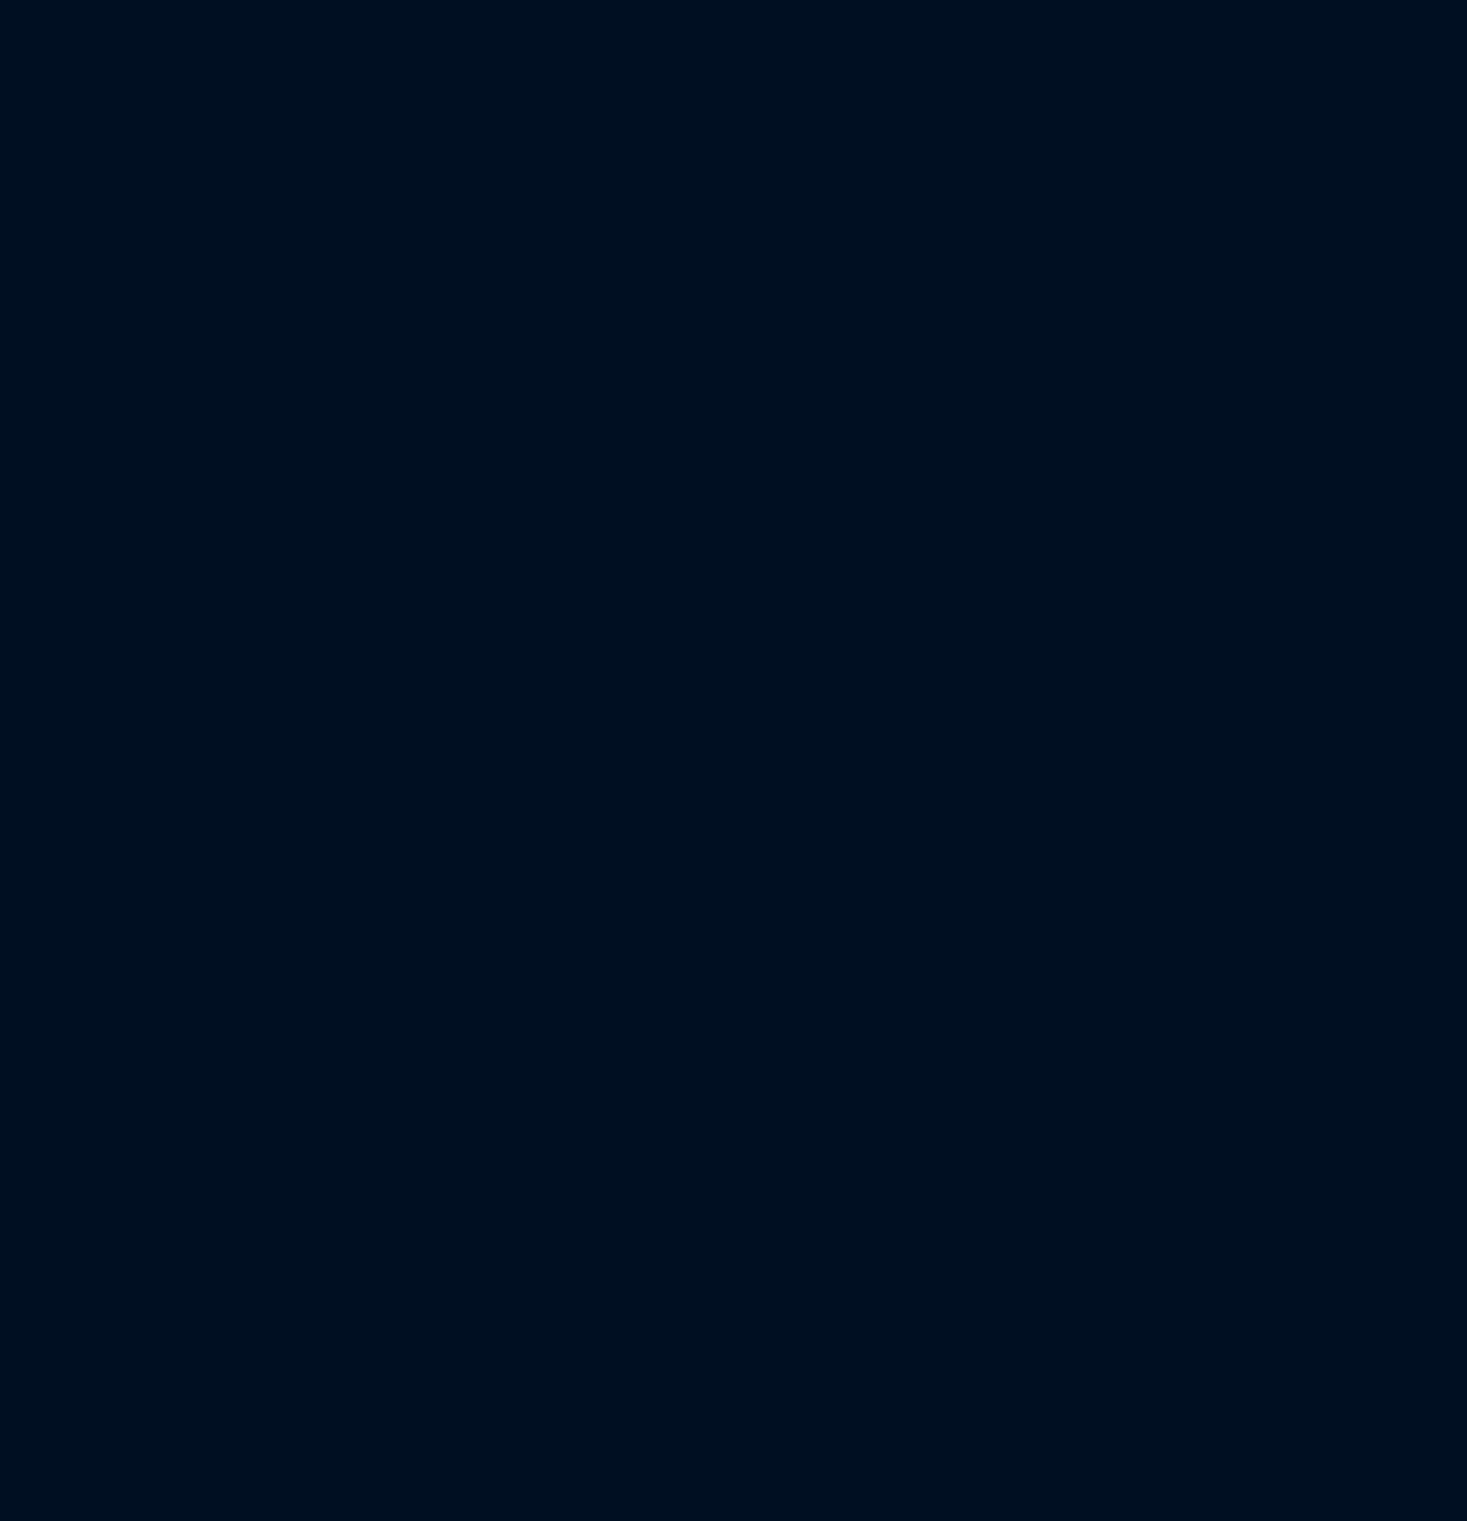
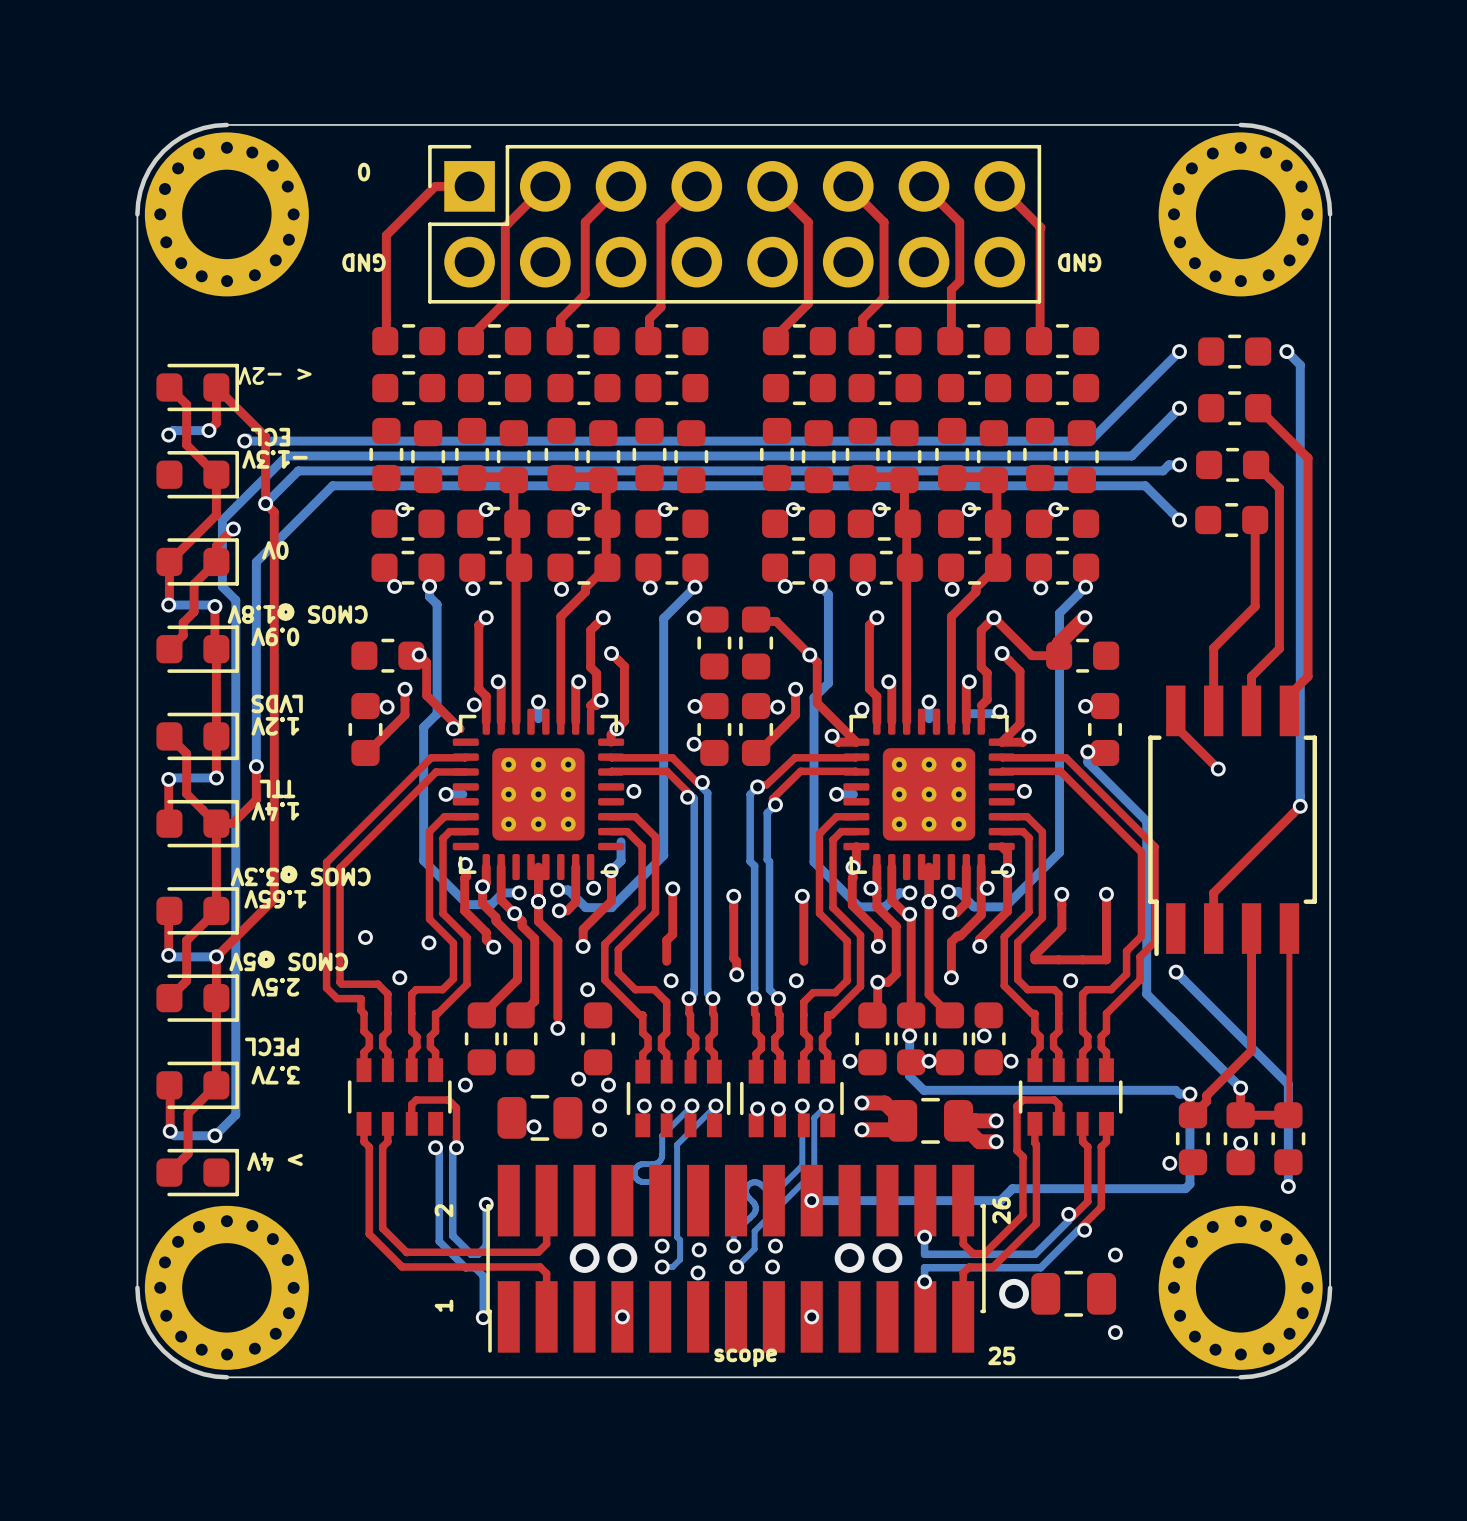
board edge: none -> (226, 124) (1240, 124) (1263, 128) (1285, 136) (1295, 143) (1311, 159) (1318, 169) (1327, 191) (1330, 214) (1330, 1287) (1327, 1310) (1318, 1332) (1311, 1342) (1295, 1358) (1285, 1365) (1263, 1374) (1240, 1377) (226, 1377) (203, 1374) (182, 1365) (172, 1358) (155, 1342) (149, 1332) (140, 1310) (137, 1287) (137, 214) (140, 191) (144, 180) (155, 159) (163, 151) (172, 143) (192, 131) (203, 128) (226, 124)
text: none -> 0 (364, 172)
top track: none -> (469, 186) (435, 186) (386, 235) (386, 341) (390, 341)
top track: none -> (545, 186) (505, 226) (505, 301) (472, 335) (472, 341)
top track: none -> (621, 186) (585, 222) (585, 294) (560, 318) (560, 341)
top track: none -> (696, 186) (661, 222) (661, 307) (649, 318) (649, 341)
top track: none -> (772, 186) (808, 222) (808, 303) (776, 335) (776, 341) (772, 336)
top track: none -> (848, 186) (884, 222) (884, 297) (862, 318) (862, 341)
top track: none -> (923, 186) (959, 222) (959, 281) (951, 289) (951, 341)
top track: none -> (999, 186) (1040, 227) (1040, 341)
part: none -> (226, 214)
part: none -> (1240, 214)
part: none -> (734, 224)
text: none -> GND (364, 262)
text: none -> GND (1079, 262)
part: none -> (408, 341)
part: none -> (494, 341)
part: none -> (583, 341)
part: none -> (671, 341)
part: none -> (799, 341)
part: none -> (885, 341)
part: none -> (973, 341)
part: none -> (1062, 341)
bottom track: none -> (1179, 351) (1090, 441) (244, 441) (247, 438)
via: none -> (1179, 351)
part: none -> (1234, 351)
bottom track: none -> (1286, 351) (1300, 364) (1300, 806)
via: none -> (1286, 351)
text: none -> < -2V (274, 375)
top track: none -> (169, 387) (186, 404) (186, 444) (216, 474) (216, 514) (169, 561) (168, 605)
part: none -> (197, 387)
part: none -> (408, 388)
part: none -> (494, 388)
part: none -> (583, 388)
part: none -> (671, 388)
part: none -> (799, 388)
part: none -> (885, 388)
part: none -> (974, 388)
part: none -> (1062, 388)
bottom track: none -> (1179, 408) (1131, 455) (286, 455) (222, 520) (222, 586) (235, 600) (235, 1114) (214, 1135) (174, 1135) (170, 1131)
via: none -> (1179, 408)
part: none -> (1234, 408)
top track: none -> (1258, 408) (1308, 458) (1308, 676) (1289, 695) (1289, 710)
top track: none -> (208, 430) (216, 423) (216, 387) (265, 436) (265, 503) (274, 512) (274, 899) (216, 956) (216, 1085) (188, 1113) (188, 1153) (169, 1172)
bottom track: none -> (208, 430) (173, 430) (168, 435)
via: none -> (208, 430)
via: none -> (168, 435)
text: none -> ECL (270, 437)
via: none -> (244, 441)
part: none -> (386, 454)
part: none -> (472, 454)
part: none -> (561, 454)
part: none -> (649, 454)
part: none -> (776, 454)
part: none -> (862, 454)
part: none -> (952, 454)
part: none -> (1040, 454)
part: none -> (428, 456)
part: none -> (513, 456)
part: none -> (603, 456)
part: none -> (691, 456)
part: none -> (818, 456)
part: none -> (904, 456)
part: none -> (993, 456)
part: none -> (1081, 456)
text: none -> -1.3V (274, 459)
bottom track: none -> (1179, 464) (1168, 464) (1162, 470) (298, 470) (265, 503)
via: none -> (1179, 464)
part: none -> (1232, 464)
top track: none -> (1256, 464) (1279, 488) (1279, 648) (1251, 676) (1251, 710)
part: none -> (197, 474)
top track: none -> (472, 476) (511, 476) (513, 479) (513, 521) (516, 523) (516, 565) (518, 567) (516, 569) (516, 721)
top track: none -> (561, 476) (601, 476) (606, 482) (606, 567) (585, 587) (585, 591) (560, 616) (560, 721)
top track: none -> (862, 476) (902, 476) (904, 479) (904, 521) (906, 523) (906, 565) (908, 567) (906, 569) (906, 721)
top track: none -> (952, 476) (991, 476) (996, 482) (996, 567) (976, 587) (976, 591) (951, 616) (951, 721)
via: none -> (265, 503)
via: none -> (402, 509)
via: none -> (486, 509)
via: none -> (578, 509)
via: none -> (665, 509)
via: none -> (793, 509)
via: none -> (879, 509)
via: none -> (969, 509)
via: none -> (1055, 509)
bottom track: none -> (1179, 520) (1145, 485) (332, 485) (256, 562) (256, 766)
via: none -> (1179, 520)
part: none -> (1231, 520)
top track: none -> (1255, 520) (1255, 606) (1213, 648) (1213, 710)
part: none -> (408, 523)
part: none -> (493, 523)
part: none -> (583, 523)
part: none -> (671, 523)
part: none -> (798, 523)
part: none -> (884, 523)
part: none -> (974, 523)
part: none -> (1062, 523)
top track: none -> (233, 528) (216, 546) (216, 561) (194, 584) (194, 611) (183, 622) (183, 635) (169, 649)
via: none -> (233, 528)
text: none -> 0V (275, 550)
part: none -> (197, 561)
part: none -> (408, 567)
part: none -> (495, 567)
part: none -> (583, 567)
part: none -> (671, 567)
part: none -> (798, 567)
part: none -> (886, 567)
part: none -> (974, 567)
part: none -> (1062, 567)
via: none -> (394, 586)
bottom track: none -> (429, 586) (429, 596) (437, 604) (437, 713) (423, 727) (423, 860) (467, 904) (491, 904) (502, 892) (519, 892)
via: none -> (429, 586)
via: none -> (785, 586)
bottom track: none -> (820, 586) (828, 594) (828, 683) (814, 697) (814, 861) (858, 906) (885, 906) (899, 892) (909, 892)
via: none -> (820, 586)
via: none -> (650, 587)
bottom track: none -> (694, 587) (663, 618) (663, 855)
via: none -> (694, 587)
via: none -> (1040, 587)
bottom track: none -> (1085, 587) (1059, 613) (1059, 852) (1005, 906) (974, 906) (958, 891) (948, 891)
via: none -> (1085, 587)
via: none -> (472, 588)
via: none -> (863, 588)
via: none -> (561, 589)
via: none -> (952, 589)
bottom track: none -> (168, 605) (214, 606)
via: none -> (168, 605)
top track: none -> (214, 606) (216, 777)
via: none -> (214, 606)
text: none -> CMOS @1.8V (297, 613)
top track: none -> (486, 617) (478, 625) (478, 688) (486, 696) (486, 721)
via: none -> (486, 617)
top track: none -> (603, 617) (590, 630) (590, 667) (596, 673) (596, 699) (590, 705) (595, 705) (601, 700)
via: none -> (603, 617)
via: none -> (694, 617)
top track: none -> (876, 617) (869, 625) (869, 688) (876, 696) (876, 721)
via: none -> (876, 617)
via: none -> (993, 617)
top track: none -> (1084, 617) (1059, 643) (1059, 655) (1031, 655) (993, 617) (981, 630) (981, 667) (987, 673) (987, 699) (981, 705)
via: none -> (1084, 617)
top track: none -> (756, 621) (776, 621) (817, 662) (817, 703) (856, 742) (838, 742) (832, 736)
text: none -> 0.9V (275, 636)
part: none -> (714, 643)
part: none -> (756, 643)
part: none -> (197, 649)
top track: none -> (611, 653) (624, 666) (624, 721) (611, 734) (611, 742)
via: none -> (611, 653)
top track: none -> (1002, 653) (1020, 671) (1020, 723) (1001, 742) (1022, 742) (1028, 736)
via: none -> (1002, 653)
top track: none -> (419, 654) (426, 662) (426, 695) (459, 728) (453, 728)
via: none -> (419, 654)
via: none -> (809, 654)
part: none -> (387, 655)
part: none -> (1082, 655)
top track: none -> (498, 681) (501, 684) (501, 721)
via: none -> (498, 681)
top track: none -> (578, 681) (575, 684) (575, 721)
via: none -> (578, 681)
top track: none -> (888, 681) (891, 684) (891, 721)
via: none -> (888, 681)
top track: none -> (969, 681) (966, 684) (966, 721)
via: none -> (969, 681)
top track: none -> (405, 689) (405, 714) (365, 752)
via: none -> (405, 689)
top track: none -> (795, 689) (795, 714) (756, 752)
via: none -> (795, 689)
via: none -> (601, 700)
bottom track: none -> (538, 701) (538, 718)
via: none -> (538, 701)
bottom track: none -> (929, 701) (929, 718)
via: none -> (929, 701)
text: none -> LVDS (277, 703)
via: none -> (474, 704)
via: none -> (694, 706)
via: none -> (1085, 706)
via: none -> (387, 707)
via: none -> (777, 707)
via: none -> (861, 709)
top track: none -> (1175, 710) (1175, 726) (1218, 769)
bottom track: none -> (999, 711) (997, 713) (971, 713)
via: none -> (999, 711)
text: none -> 1.2V (275, 726)
via: none -> (453, 728)
via: none -> (616, 728)
part: none -> (365, 729)
part: none -> (714, 729)
part: none -> (756, 729)
part: none -> (1104, 729)
top track: none -> (169, 736) (186, 753) (186, 793) (216, 823)
part: none -> (197, 736)
via: none -> (832, 736)
via: none -> (1028, 736)
via: none -> (694, 744)
bottom track: none -> (1087, 751) (1087, 762) (1146, 821) (1146, 994) (1240, 1088)
via: none -> (1087, 751)
top track: none -> (465, 757) (431, 757) (326, 862) (326, 988) (337, 998) (361, 998) (361, 1010) (364, 1013) (364, 1031) (369, 1036) (369, 1047) (364, 1052) (364, 1070)
top track: none -> (611, 757) (672, 757) (697, 782) (702, 782)
top track: none -> (856, 757) (795, 757) (766, 784) (759, 784) (757, 786)
top track: none -> (1001, 757) (1066, 757) (1154, 846) (1154, 941) (1140, 956) (1140, 979) (1106, 1013) (1106, 1031) (1101, 1036) (1101, 1047) (1106, 1052) (1106, 1070)
top track: none -> (256, 766) (256, 799) (232, 823) (216, 823)
via: none -> (256, 766)
via: none -> (1218, 769)
top track: none -> (465, 772) (436, 772) (340, 868) (340, 982) (341, 984) (377, 984) (387, 994) (387, 1031) (382, 1036) (382, 1047) (387, 1052) (387, 1070)
top track: none -> (611, 772) (666, 771) (687, 792) (687, 797)
top track: none -> (856, 772) (800, 771) (772, 798) (775, 804)
top track: none -> (1001, 772) (1060, 771) (1141, 852) (1141, 936) (1126, 951) (1126, 974) (1111, 989) (1087, 989) (1082, 994) (1082, 1031) (1087, 1036) (1087, 1047) (1082, 1052) (1082, 1070)
bottom track: none -> (216, 777) (168, 779)
via: none -> (216, 777)
top track: none -> (168, 779) (169, 823)
via: none -> (168, 779)
bottom track: none -> (702, 782) (702, 787) (707, 793) (707, 993) (712, 998)
via: none -> (702, 782)
bottom track: none -> (757, 786) (750, 794) (750, 861) (754, 865) (754, 998)
via: none -> (757, 786)
text: none -> TTL (277, 788)
via: none -> (633, 791)
via: none -> (1024, 791)
bottom track: none -> (446, 794) (462, 794)
via: none -> (446, 794)
part: none -> (538, 794)
bottom track: none -> (836, 794) (853, 794)
via: none -> (836, 794)
part: none -> (929, 794)
bottom track: none -> (687, 797) (694, 798) (694, 993) (689, 998)
via: none -> (687, 797)
bottom track: none -> (775, 804) (767, 813) (767, 859) (769, 861) (769, 989) (778, 998)
via: none -> (775, 804)
top track: none -> (1300, 806) (1213, 892) (1213, 928)
via: none -> (1300, 806)
text: none -> 1.4V (275, 811)
top track: none -> (465, 816) (444, 816) (429, 831) (429, 919) (453, 943) (453, 978) (442, 989) (416, 989) (411, 994) (411, 1031) (416, 1036) (416, 1047) (411, 1052) (411, 1070)
top track: none -> (611, 816) (635, 816) (655, 836) (655, 912) (618, 949) (618, 972) (635, 989) (654, 989) (666, 1001) (666, 1032) (661, 1038) (661, 1048) (666, 1053) (666, 1071)
top track: none -> (856, 816) (836, 816) (819, 833) (819, 913) (847, 940) (847, 980) (835, 992) (813, 992) (803, 1001) (803, 1032) (809, 1038) (809, 1048) (803, 1053) (803, 1071)
top track: none -> (1001, 816) (1027, 816) (1042, 832) (1042, 917) (1017, 942) (1017, 979) (1027, 989) (1054, 989) (1058, 994) (1058, 1031) (1053, 1036) (1053, 1047) (1058, 1052) (1058, 1070)
part: none -> (1232, 820)
part: none -> (197, 823)
top track: none -> (216, 823) (216, 910) (186, 940) (186, 980) (169, 998)
top track: none -> (465, 831) (449, 831) (443, 838) (443, 913) (466, 937) (466, 984) (437, 1013) (435, 1013) (435, 1031) (430, 1036) (430, 1047) (435, 1052) (435, 1070)
top track: none -> (611, 831) (627, 831) (642, 846) (642, 906) (604, 944) (604, 980) (639, 1015) (642, 1015) (642, 1032) (648, 1038) (648, 1048) (642, 1053) (642, 1071)
top track: none -> (856, 831) (841, 831) (832, 839) (832, 907) (860, 935) (860, 986) (831, 1015) (827, 1015) (827, 1032) (822, 1038) (822, 1048) (827, 1053) (827, 1071)
top track: none -> (1001, 831) (1022, 831) (1028, 837) (1028, 912) (1004, 936) (1004, 985) (1031, 1013) (1034, 1013) (1034, 1031) (1040, 1036) (1040, 1047) (1034, 1052) (1034, 1070)
bottom track: none -> (621, 841) (621, 860) (611, 870)
top track: none -> (856, 846) (856, 864) (853, 867) (852, 905) (878, 931) (878, 946)
top track: none -> (1001, 846) (1007, 852) (1007, 911) (979, 938) (979, 946)
bottom track: none -> (663, 855) (611, 907) (585, 907) (568, 889) (557, 889)
top track: none -> (465, 864) (464, 910) (486, 932) (486, 939) (493, 947)
via: none -> (465, 864)
top track: none -> (486, 867) (486, 883) (482, 886) (482, 903) (495, 917) (495, 921) (517, 942) (517, 979) (481, 1015)
top track: none -> (501, 867) (501, 900) (522, 921) (522, 926) (534, 938) (534, 1001) (520, 1015)
top track: none -> (538, 867) (538, 921) (557, 940) (557, 1017)
top track: none -> (575, 867) (575, 902) (567, 910) (559, 910)
via: none -> (853, 867)
top track: none -> (876, 867) (876, 906) (896, 926) (896, 974) (888, 982) (877, 982) (877, 1010) (872, 1015)
top track: none -> (891, 867) (891, 900) (911, 919) (909, 1035)
top track: none -> (929, 867) (929, 994) (949, 1015)
top track: none -> (966, 867) (966, 902) (956, 912) (949, 912)
top track: none -> (981, 867) (981, 915) (960, 935) (957, 935) (951, 941) (951, 977)
via: none -> (611, 870)
via: none -> (1007, 870)
text: none -> CMOS @3.3V (300, 875)
top track: none -> (611, 879) (611, 900) (583, 929) (583, 946)
via: none -> (482, 886)
via: none -> (593, 888)
top track: none -> (672, 888) (672, 934) (666, 940) (666, 961)
via: none -> (672, 888)
via: none -> (870, 888)
via: none -> (987, 888)
via: none -> (557, 889)
via: none -> (948, 891)
via: none -> (519, 892)
via: none -> (909, 892)
top track: none -> (1061, 894) (1061, 928) (1034, 955) (1034, 959) (1106, 959) (1106, 894)
via: none -> (1061, 894)
via: none -> (1106, 894)
top track: none -> (733, 896) (733, 958) (736, 961) (736, 974)
via: none -> (733, 896)
top track: none -> (802, 896) (803, 961)
via: none -> (802, 896)
text: none -> 1.65V (275, 899)
via: none -> (538, 901)
via: none -> (929, 901)
top track: none -> (169, 910) (168, 955)
part: none -> (197, 910)
via: none -> (559, 910)
via: none -> (949, 912)
via: none -> (514, 913)
via: none -> (909, 914)
top track: none -> (1251, 928) (1251, 1050) (1206, 1095) (1206, 1101) (1192, 1115) (1189, 1112) (1189, 1094)
top track: none -> (1289, 928) (1289, 1114) (1240, 1115) (1240, 1088)
via: none -> (365, 937)
via: none -> (428, 942)
via: none -> (583, 946)
via: none -> (878, 946)
via: none -> (979, 946)
via: none -> (493, 947)
bottom track: none -> (168, 955) (216, 956)
via: none -> (168, 955)
via: none -> (216, 956)
text: none -> CMOS @5V (288, 960)
bottom track: none -> (1176, 972) (1288, 1084) (1288, 1186)
via: none -> (1176, 972)
via: none -> (736, 974)
via: none -> (399, 977)
via: none -> (951, 977)
via: none -> (671, 980)
via: none -> (796, 980)
via: none -> (1070, 980)
via: none -> (877, 982)
text: none -> 2.5V (275, 987)
via: none -> (587, 989)
part: none -> (197, 998)
top track: none -> (689, 998) (690, 1032) (695, 1038) (695, 1048) (690, 1053) (690, 1071)
via: none -> (689, 998)
top track: none -> (712, 998) (714, 1032) (709, 1038) (709, 1048) (714, 1053) (714, 1071)
via: none -> (712, 998)
top track: none -> (754, 998) (756, 1032) (761, 1038) (761, 1048) (756, 1053) (756, 1071)
via: none -> (754, 998)
top track: none -> (778, 998) (779, 1032) (774, 1038) (774, 1048) (779, 1053) (779, 1071)
via: none -> (778, 998)
via: none -> (557, 1028)
bottom track: none -> (909, 1035) (909, 1076) (923, 1090) (1175, 1090) (1179, 1094) (1189, 1094) (1189, 1184) (1185, 1188) (1012, 1188) (1000, 1200) (811, 1200)
via: none -> (909, 1035)
via: none -> (984, 1035)
part: none -> (481, 1038)
part: none -> (520, 1038)
part: none -> (598, 1038)
part: none -> (872, 1038)
part: none -> (911, 1038)
part: none -> (949, 1038)
part: none -> (988, 1038)
text: none -> PECL (272, 1046)
via: none -> (850, 1061)
via: none -> (929, 1061)
via: none -> (1011, 1061)
text: none -> 3.7V (275, 1075)
via: none -> (578, 1079)
top track: none -> (169, 1085) (170, 1131)
part: none -> (197, 1085)
via: none -> (465, 1085)
via: none -> (608, 1085)
via: none -> (1240, 1088)
via: none -> (1189, 1094)
part: none -> (399, 1097)
part: none -> (1070, 1097)
part: none -> (678, 1098)
part: none -> (791, 1098)
via: none -> (861, 1102)
top track: none -> (870, 1102) (861, 1102) (884, 1102) (902, 1120) (893, 1129) (861, 1129)
via: none -> (599, 1105)
via: none -> (644, 1105)
via: none -> (668, 1105)
bottom track: none -> (692, 1105) (662, 1135) (662, 1155) (660, 1160) (655, 1163) (641, 1164) (635, 1169) (635, 1176) (639, 1181) (663, 1181)
via: none -> (692, 1105)
bottom track: none -> (715, 1105) (677, 1144) (677, 1237) (680, 1240) (680, 1259) (672, 1266) (662, 1266)
via: none -> (715, 1105)
bottom track: none -> (802, 1105) (802, 1165) (775, 1191) (767, 1190) (757, 1182) (748, 1184) (746, 1194) (754, 1203) (755, 1211) (733, 1234) (733, 1246)
via: none -> (802, 1105)
bottom track: none -> (826, 1105) (814, 1117) (814, 1171) (754, 1231) (754, 1249) (736, 1266)
via: none -> (826, 1105)
via: none -> (757, 1108)
via: none -> (778, 1108)
part: none -> (539, 1117)
part: none -> (930, 1120)
top track: none -> (972, 1120) (996, 1120) (958, 1120) (979, 1141) (996, 1141)
via: none -> (996, 1120)
top track: none -> (364, 1123) (364, 1141) (369, 1146) (369, 1233) (402, 1266) (540, 1266) (546, 1273) (546, 1316) (545, 1308)
top track: none -> (387, 1123) (387, 1141) (382, 1146) (382, 1228) (407, 1252)
top track: none -> (411, 1123) (411, 1104) (416, 1099) (448, 1099) (456, 1107) (456, 1147) (453, 1144)
top track: none -> (1034, 1123) (1036, 1223) (993, 1266) (969, 1266) (963, 1273) (963, 1316)
top track: none -> (1058, 1123) (1058, 1104) (1054, 1099) (1022, 1099) (1017, 1105) (1017, 1150) (1022, 1156) (1022, 1215) (984, 1253) (972, 1253) (963, 1243) (963, 1200)
top track: none -> (1082, 1123) (1082, 1141) (1087, 1146) (1087, 1201) (1071, 1217)
top track: none -> (1106, 1123) (1106, 1141) (1101, 1146) (1101, 1207) (1081, 1227)
via: none -> (533, 1126)
via: none -> (599, 1129)
via: none -> (861, 1129)
via: none -> (170, 1131)
via: none -> (214, 1135)
part: none -> (1192, 1138)
part: none -> (1240, 1138)
part: none -> (1288, 1138)
via: none -> (996, 1141)
via: none -> (1240, 1143)
bottom track: none -> (435, 1147) (439, 1151) (439, 1241) (465, 1267) (475, 1267) (483, 1275) (483, 1317)
via: none -> (435, 1147)
bottom track: none -> (456, 1147) (452, 1151) (452, 1235) (471, 1254) (478, 1254) (486, 1246) (486, 1204)
via: none -> (456, 1147)
text: none -> > 4V (274, 1162)
via: none -> (1169, 1163)
part: none -> (197, 1172)
via: none -> (1288, 1186)
top track: none -> (546, 1200) (546, 1243) (538, 1252) (406, 1252)
via: none -> (811, 1200)
via: none -> (486, 1204)
text: none -> 2 (443, 1210)
text: none -> 26 (1001, 1210)
via: none -> (1068, 1214)
bottom track: none -> (1068, 1220) (1035, 1254) (924, 1254) (924, 1237)
bottom track: none -> (1078, 1230) (1040, 1267) (924, 1267) (924, 1281)
via: none -> (1084, 1230)
via: none -> (924, 1237)
via: none -> (662, 1246)
via: none -> (733, 1246)
via: none -> (775, 1246)
via: none -> (699, 1249)
via: none -> (1115, 1255)
via: none -> (584, 1258)
via: none -> (622, 1258)
part: none -> (735, 1258)
via: none -> (849, 1258)
via: none -> (887, 1258)
via: none -> (662, 1266)
via: none -> (736, 1266)
via: none -> (772, 1266)
via: none -> (697, 1272)
via: none -> (924, 1281)
part: none -> (226, 1287)
part: none -> (1240, 1287)
via: none -> (1014, 1293)
part: none -> (1073, 1293)
text: none -> 1 (443, 1305)
via: none -> (622, 1316)
via: none -> (811, 1316)
via: none -> (483, 1317)
via: none -> (1115, 1332)
text: none -> 25 (1001, 1355)
text: none -> scope (745, 1357)

